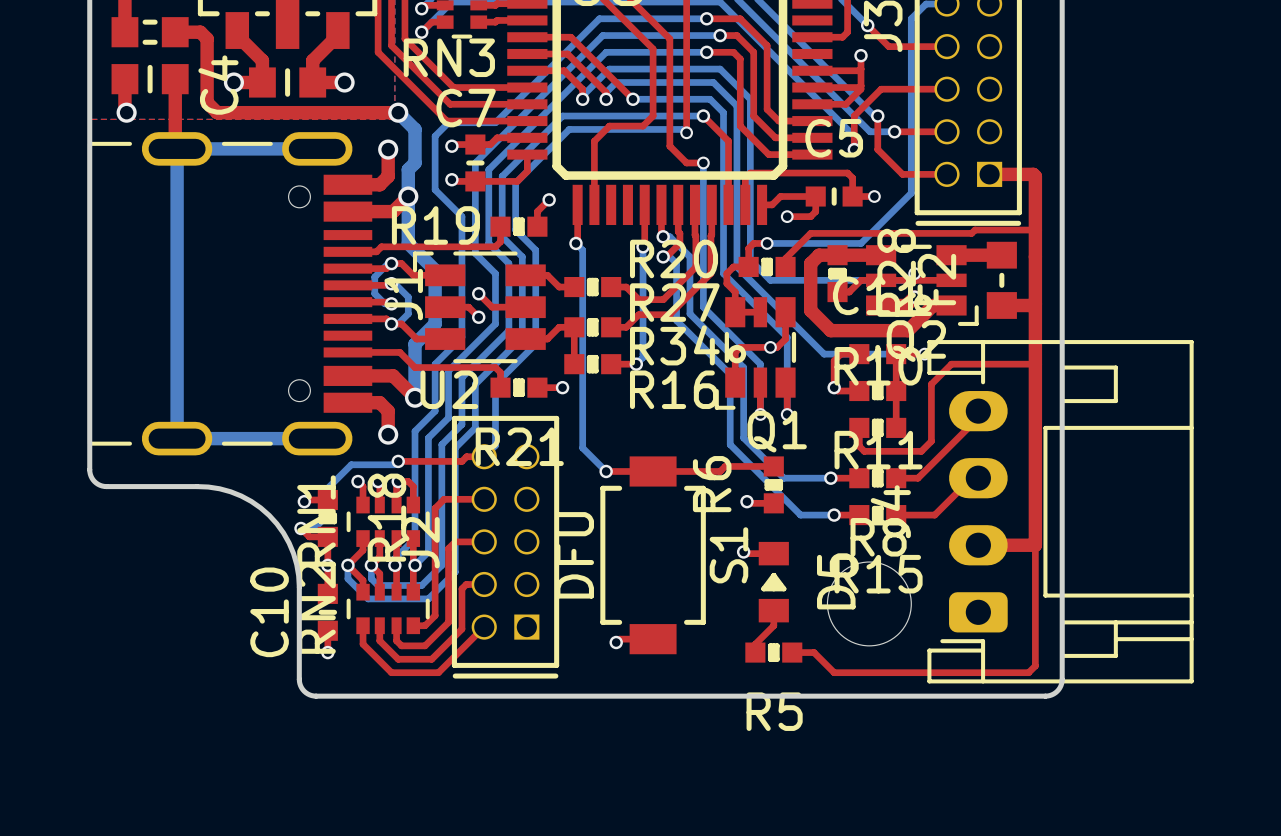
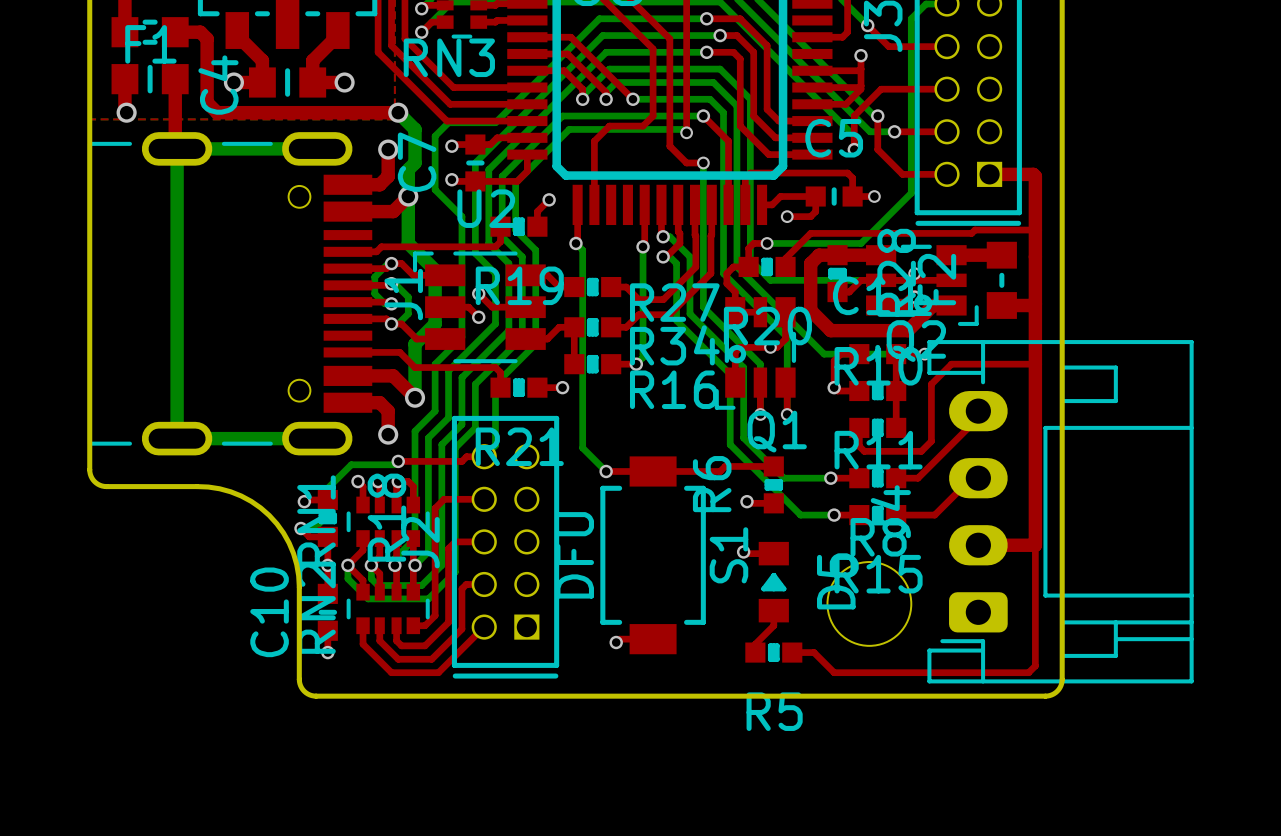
F1 name: none -> F1 (150, 44)
C7 name rotation: 0° (466, 108) -> 90° counterclockwise (417, 162)
R19 name position: R19 (435, 225) -> R19 (519, 285)
R20 name position: R20 (674, 258) -> R20 (767, 326)
U2 name position: U2 (449, 389) -> U2 (486, 208)

